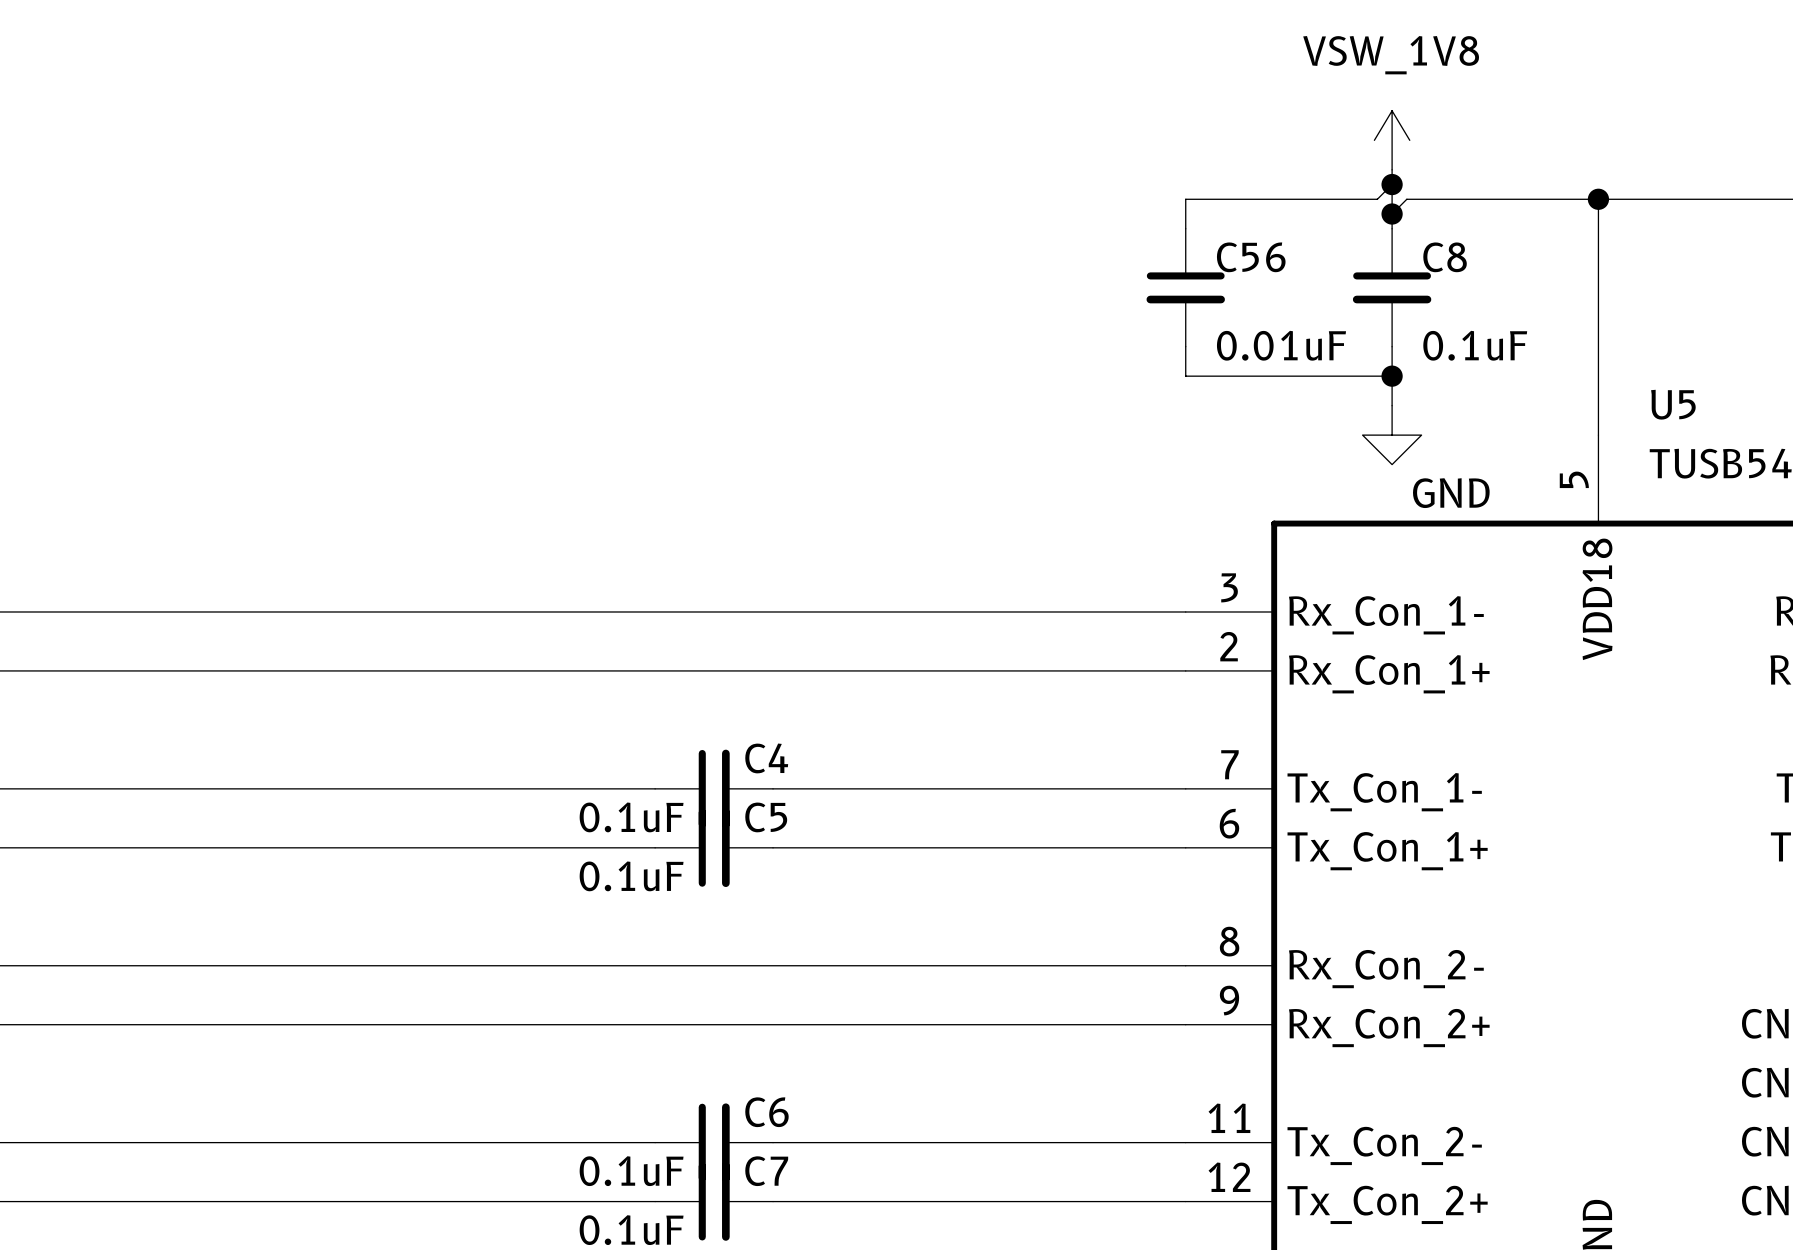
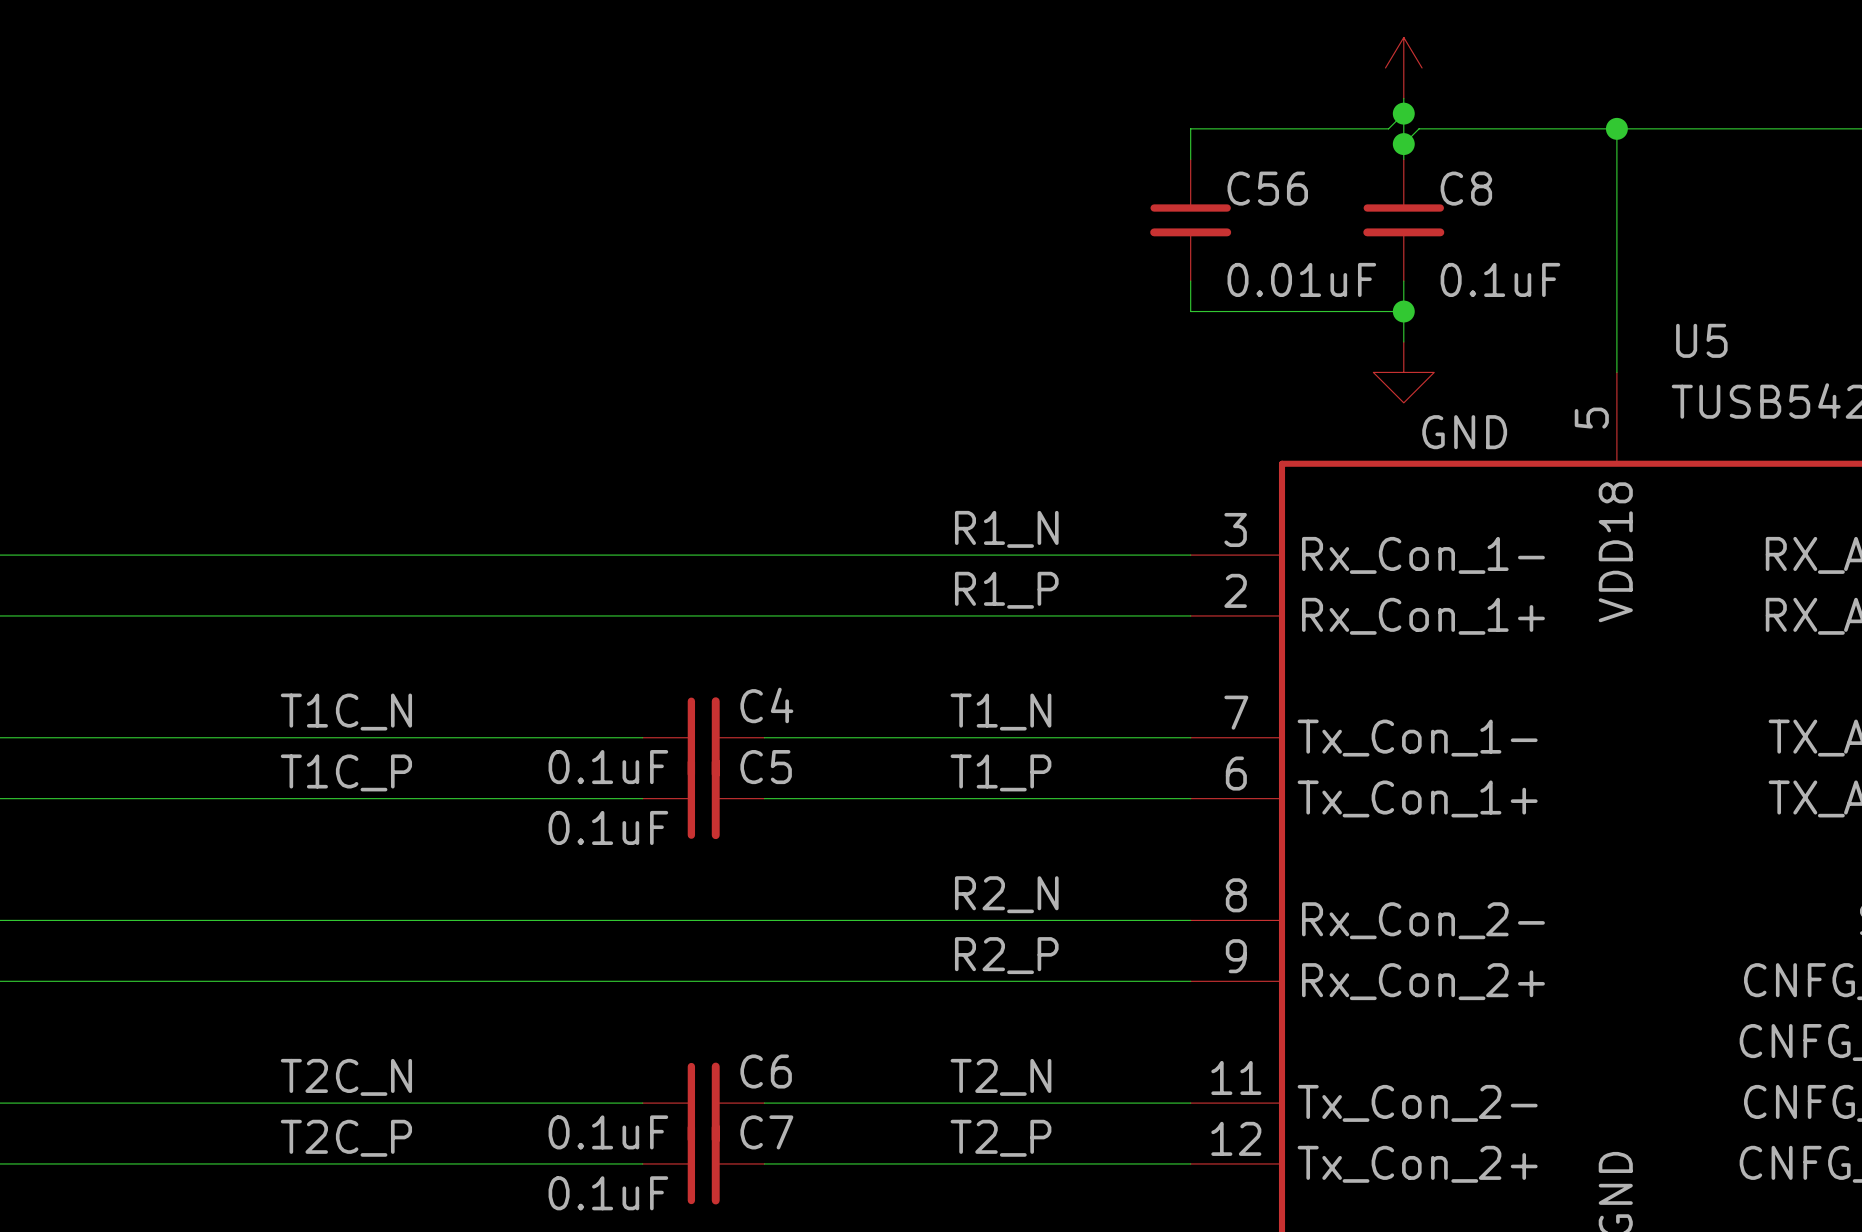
label: none -> R1_N (1006, 529)
label: none -> R1_P (1006, 590)
label: none -> T1C_N (346, 712)
label: none -> T1_N (1000, 712)
label: none -> T1C_P (346, 772)
label: none -> T1_P (1000, 772)
label: none -> R2_N (1006, 894)
label: none -> R2_P (1006, 955)
label: none -> T2C_N (346, 1077)
label: none -> T2_N (1000, 1077)
label: none -> T2C_P (346, 1138)
label: none -> T2_P (1000, 1138)

